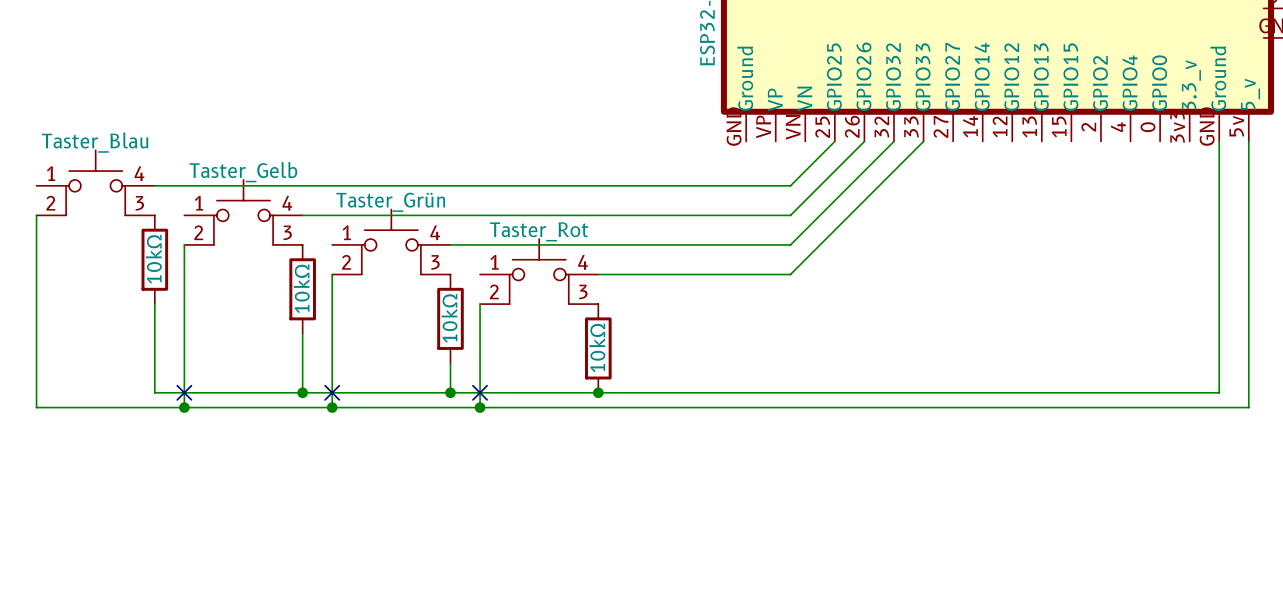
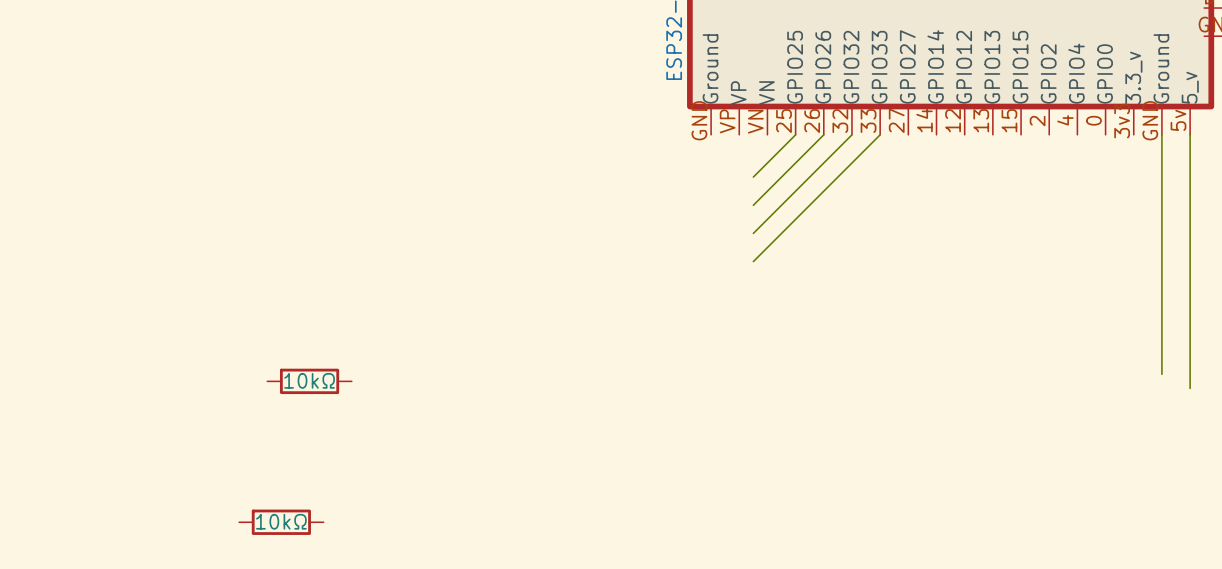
part: Taster_Blau (95, 182) -> none
wire: (154, 185) (790, 185) -> none
part: Taster_Gelb (243, 212) -> none
wire: (36, 215) (36, 407) (1248, 407) -> none
wire: (302, 215) (790, 215) -> none
part: Taster_Grün (391, 242) -> none
wire: (184, 244) (184, 407) -> none
wire: (450, 244) (790, 244) -> none
part: 10kΩ (154, 259) -> none
part: Taster_Rot (539, 271) -> none
wire: (332, 274) (332, 407) -> none
wire: (598, 274) (790, 274) -> none
part: 10kΩ (302, 289) -> none
wire: (154, 304) (154, 392) (1219, 392) -> none
wire: (480, 304) (480, 407) -> none
part: 10kΩ (450, 318) -> none
wire: (302, 333) (302, 392) -> none
part: 10kΩ (598, 348) -> none
wire: (450, 363) (450, 392) -> none
no-connect mark: (184, 392) -> none
junction: (302, 392) -> none
no-connect mark: (332, 392) -> none
junction: (450, 392) -> none
no-connect mark: (480, 392) -> none
junction: (598, 392) -> none
part: none -> 10kΩ (309, 381)
junction: (184, 407) -> none
junction: (332, 407) -> none
junction: (480, 407) -> none
part: none -> 10kΩ (281, 522)

